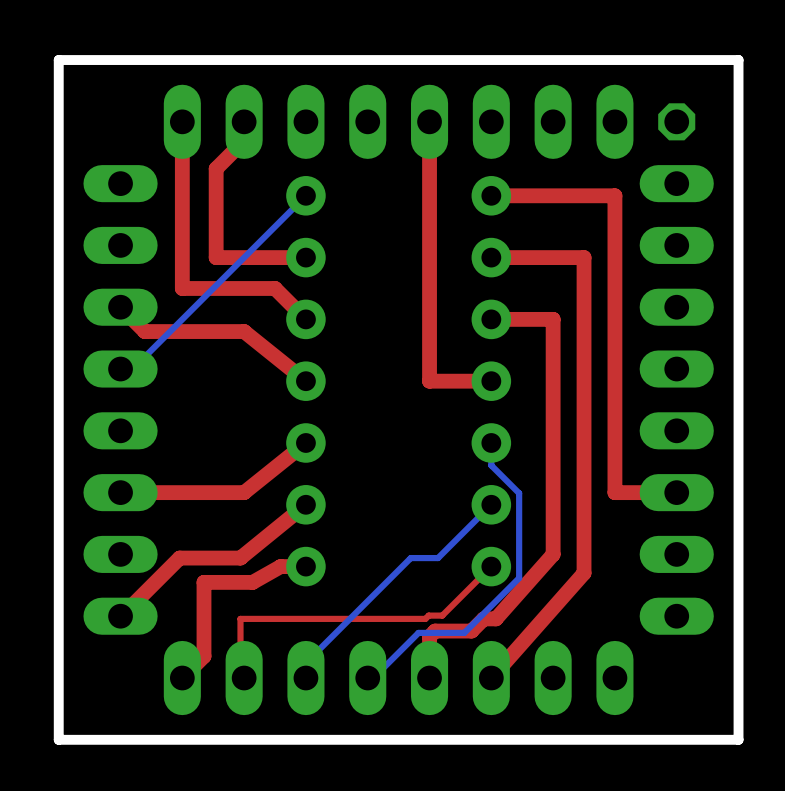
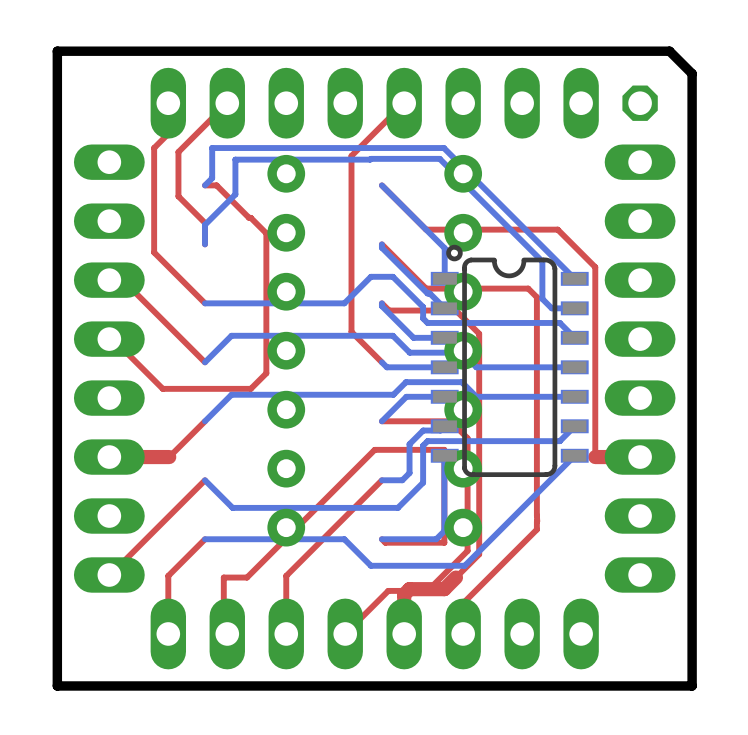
board edge: (738, 60) (738, 739) (58, 739) (58, 60) (738, 60) -> (669, 51) (692, 73) (692, 685) (57, 685) (57, 51) (669, 51)
top track: (244, 121) (244, 140) (216, 168) (216, 257) (305, 257) -> (227, 103) (178, 152) (178, 196) (204, 222) (204, 244)
top track: (429, 121) (429, 381) (491, 381) -> (404, 103) (351, 155) (351, 331) (381, 362)
top track: (182, 153) (182, 288) (275, 288) (305, 319) -> (168, 133) (154, 148) (154, 252) (204, 303)
bottom track: (305, 195) (132, 369) (120, 369) -> none
top track: (491, 195) (614, 195) (614, 492) (629, 492) -> (381, 185) (426, 229) (557, 229) (595, 267) (595, 457)
top track: none -> (204, 185) (216, 185) (266, 233) (266, 373) (250, 388) (162, 388) (113, 339) (109, 339)
bottom track: none -> (204, 185) (212, 178) (212, 148) (443, 148) (574, 278)
bottom track: none -> (381, 185) (444, 248) (444, 278)
top track: (491, 257) (584, 257) (584, 573) (491, 678) -> (381, 244) (426, 288) (528, 288) (536, 297) (536, 529) (463, 603) (463, 633)
bottom track: none -> (204, 244) (204, 224) (235, 194) (235, 159) (439, 158) (542, 261) (542, 298) (551, 308) (574, 308)
bottom track: none -> (381, 244) (381, 247) (444, 308)
top track: (120, 307) (144, 331) (244, 331) (305, 381) -> (109, 280) (122, 280) (204, 362)
top track: (491, 319) (553, 319) (553, 554) (495, 618) (483, 618) -> (381, 303) (389, 310) (455, 310) (479, 333) (479, 554) (455, 577)
bottom track: none -> (204, 303) (344, 303) (370, 276) (392, 276) (423, 307) (423, 318) (427, 322) (559, 322) (574, 337)
bottom track: none -> (381, 303) (381, 306) (413, 337) (444, 337)
part: none -> (509, 360)
bottom track: none -> (204, 362) (231, 335) (392, 335) (409, 352) (461, 352) (476, 367) (574, 367)
bottom track: none -> (381, 362) (386, 367) (444, 367)
bottom track: none -> (444, 396) (406, 396) (381, 421)
bottom track: none -> (574, 396) (476, 396) (461, 382) (406, 382) (393, 394) (231, 394) (204, 421)
top track: (305, 442) (244, 492) (183, 492) -> (204, 421) (169, 457)
bottom track: (491, 442) (491, 465) (519, 493) (519, 578) (464, 632) (418, 632) (373, 678) (367, 678) -> none
top track: none -> (381, 421) (450, 421) (467, 438) (467, 550) (427, 590) (388, 590) (345, 633)
bottom track: none -> (444, 426) (440, 430) (423, 430) (409, 444) (409, 473) (402, 480) (381, 480)
bottom track: none -> (574, 426) (559, 441) (427, 441) (423, 445) (423, 482) (397, 507) (232, 507) (204, 480)
bottom track: none -> (444, 455) (444, 531) (436, 539) (381, 539)
bottom track: none -> (574, 455) (464, 565) (370, 565) (344, 539) (204, 539)
top track: (305, 504) (240, 558) (179, 558) -> (204, 480) (165, 519)
bottom track: (491, 504) (438, 558) (410, 558) (305, 662) (305, 678) -> none
top track: none -> (381, 480) (286, 575) (286, 633)
top track width: thick (179, 558) (121, 616) -> thin (165, 519) (110, 575)
top track: (305, 566) (280, 566) (252, 582) (204, 582) (204, 656) (182, 678) -> (204, 539) (168, 575) (168, 633)
top track: (491, 566) (442, 615) (428, 615) (425, 618) (264, 618) -> (381, 539) (385, 542) (444, 542) (444, 449) (374, 449) (247, 577)

